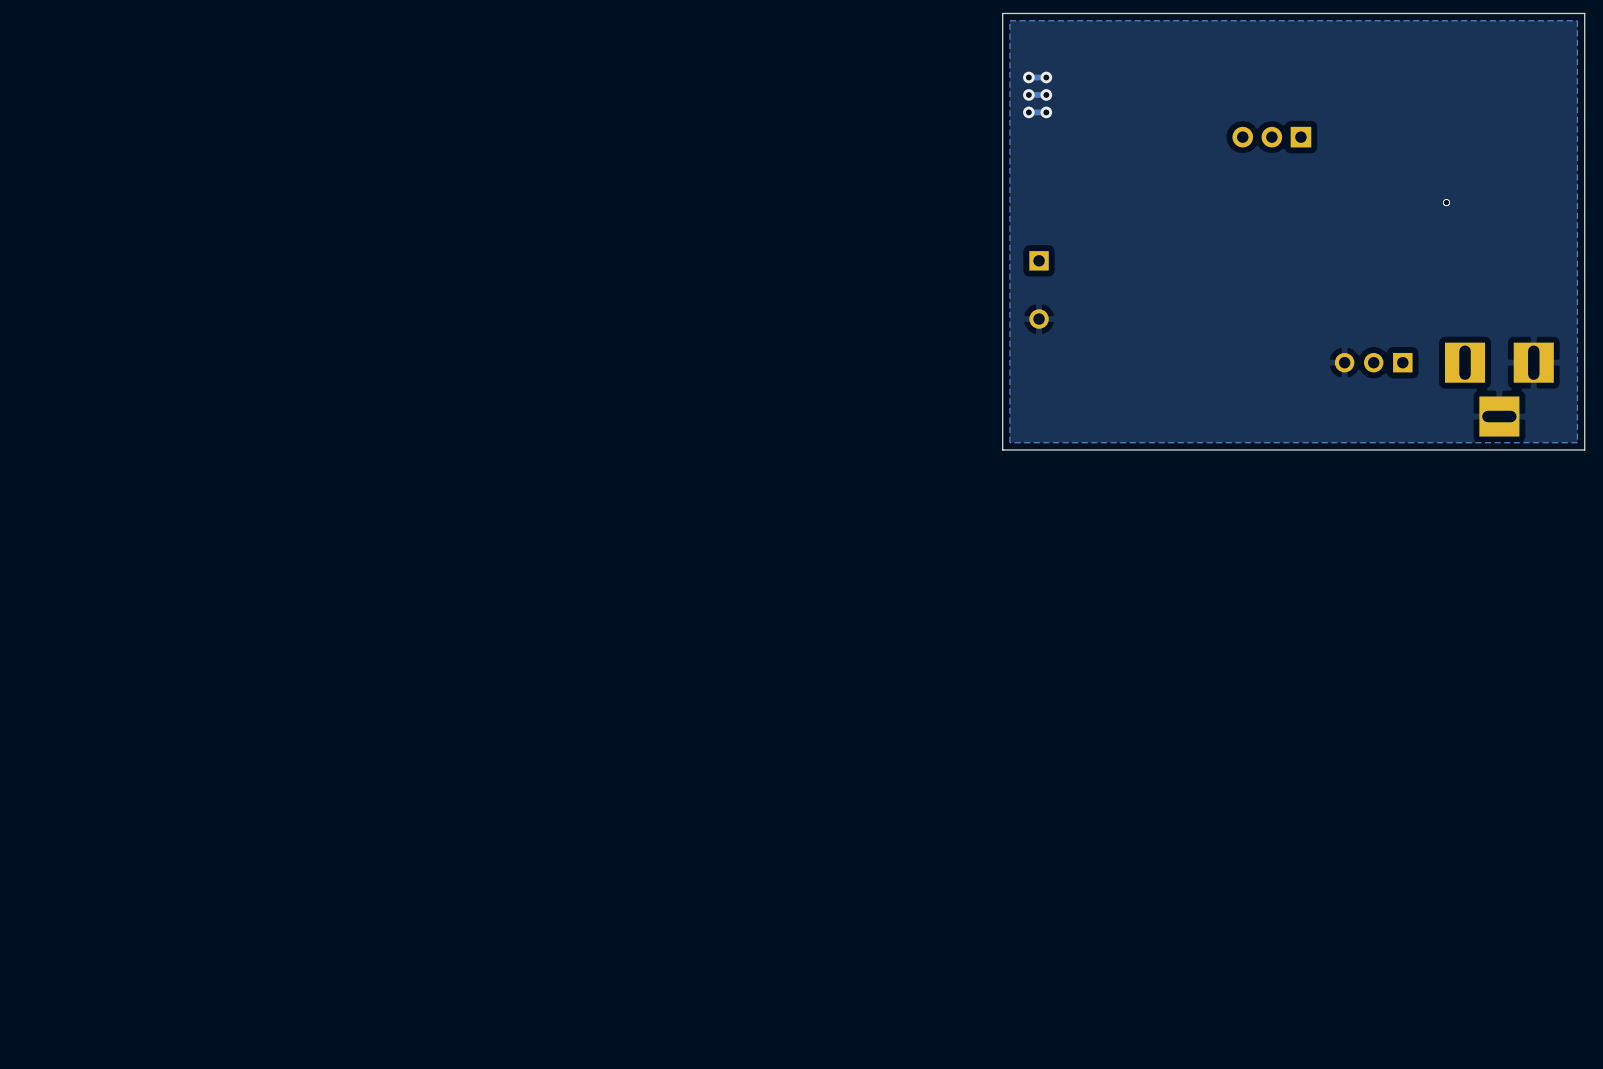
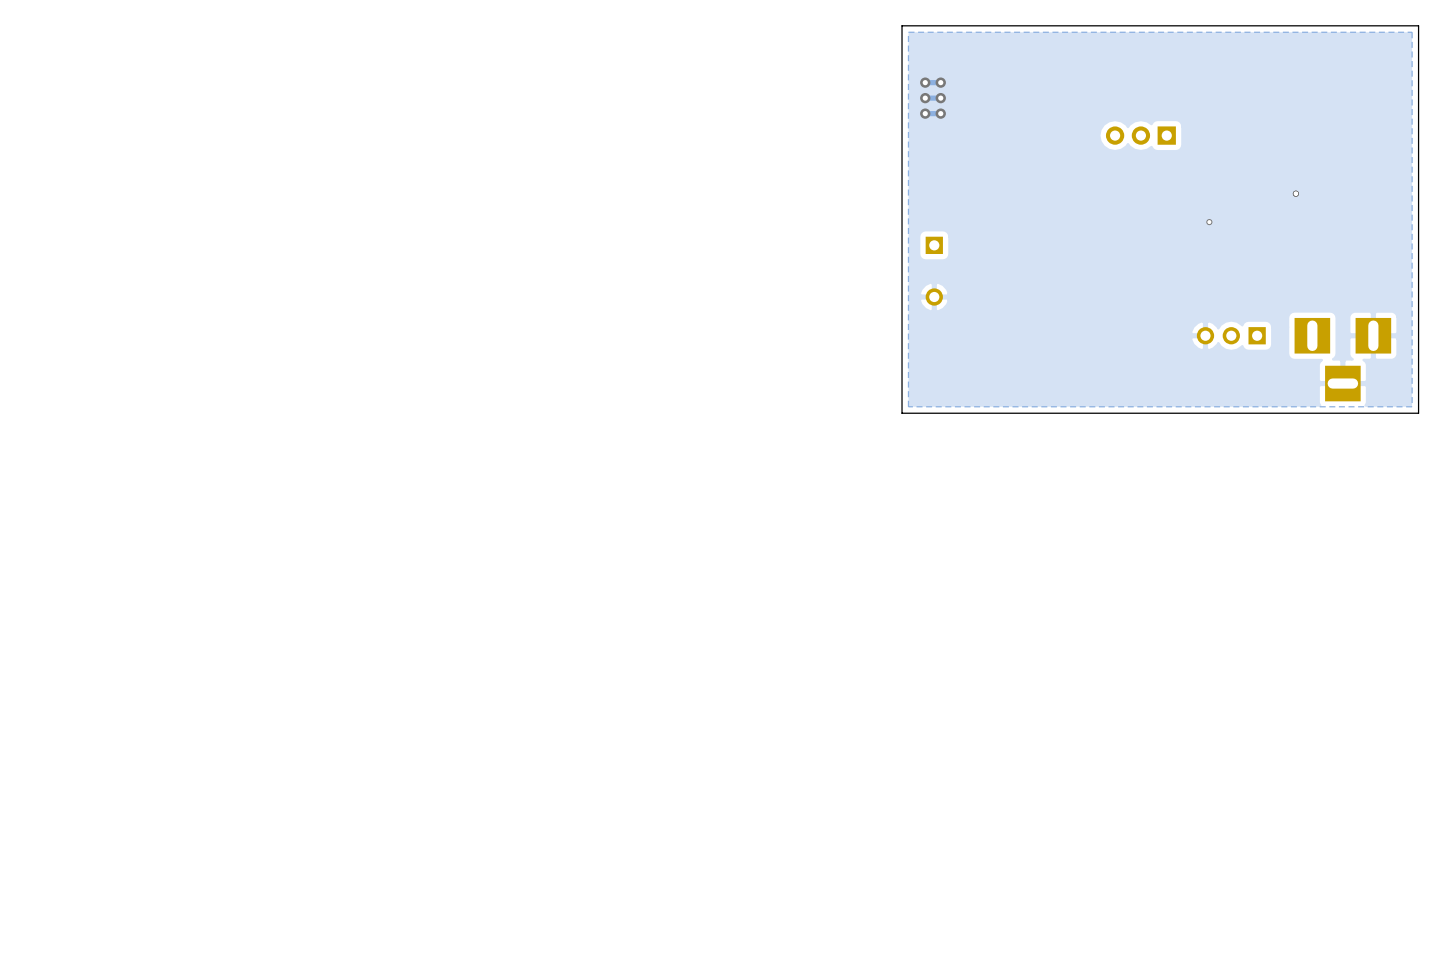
via: none -> (1209, 222)

